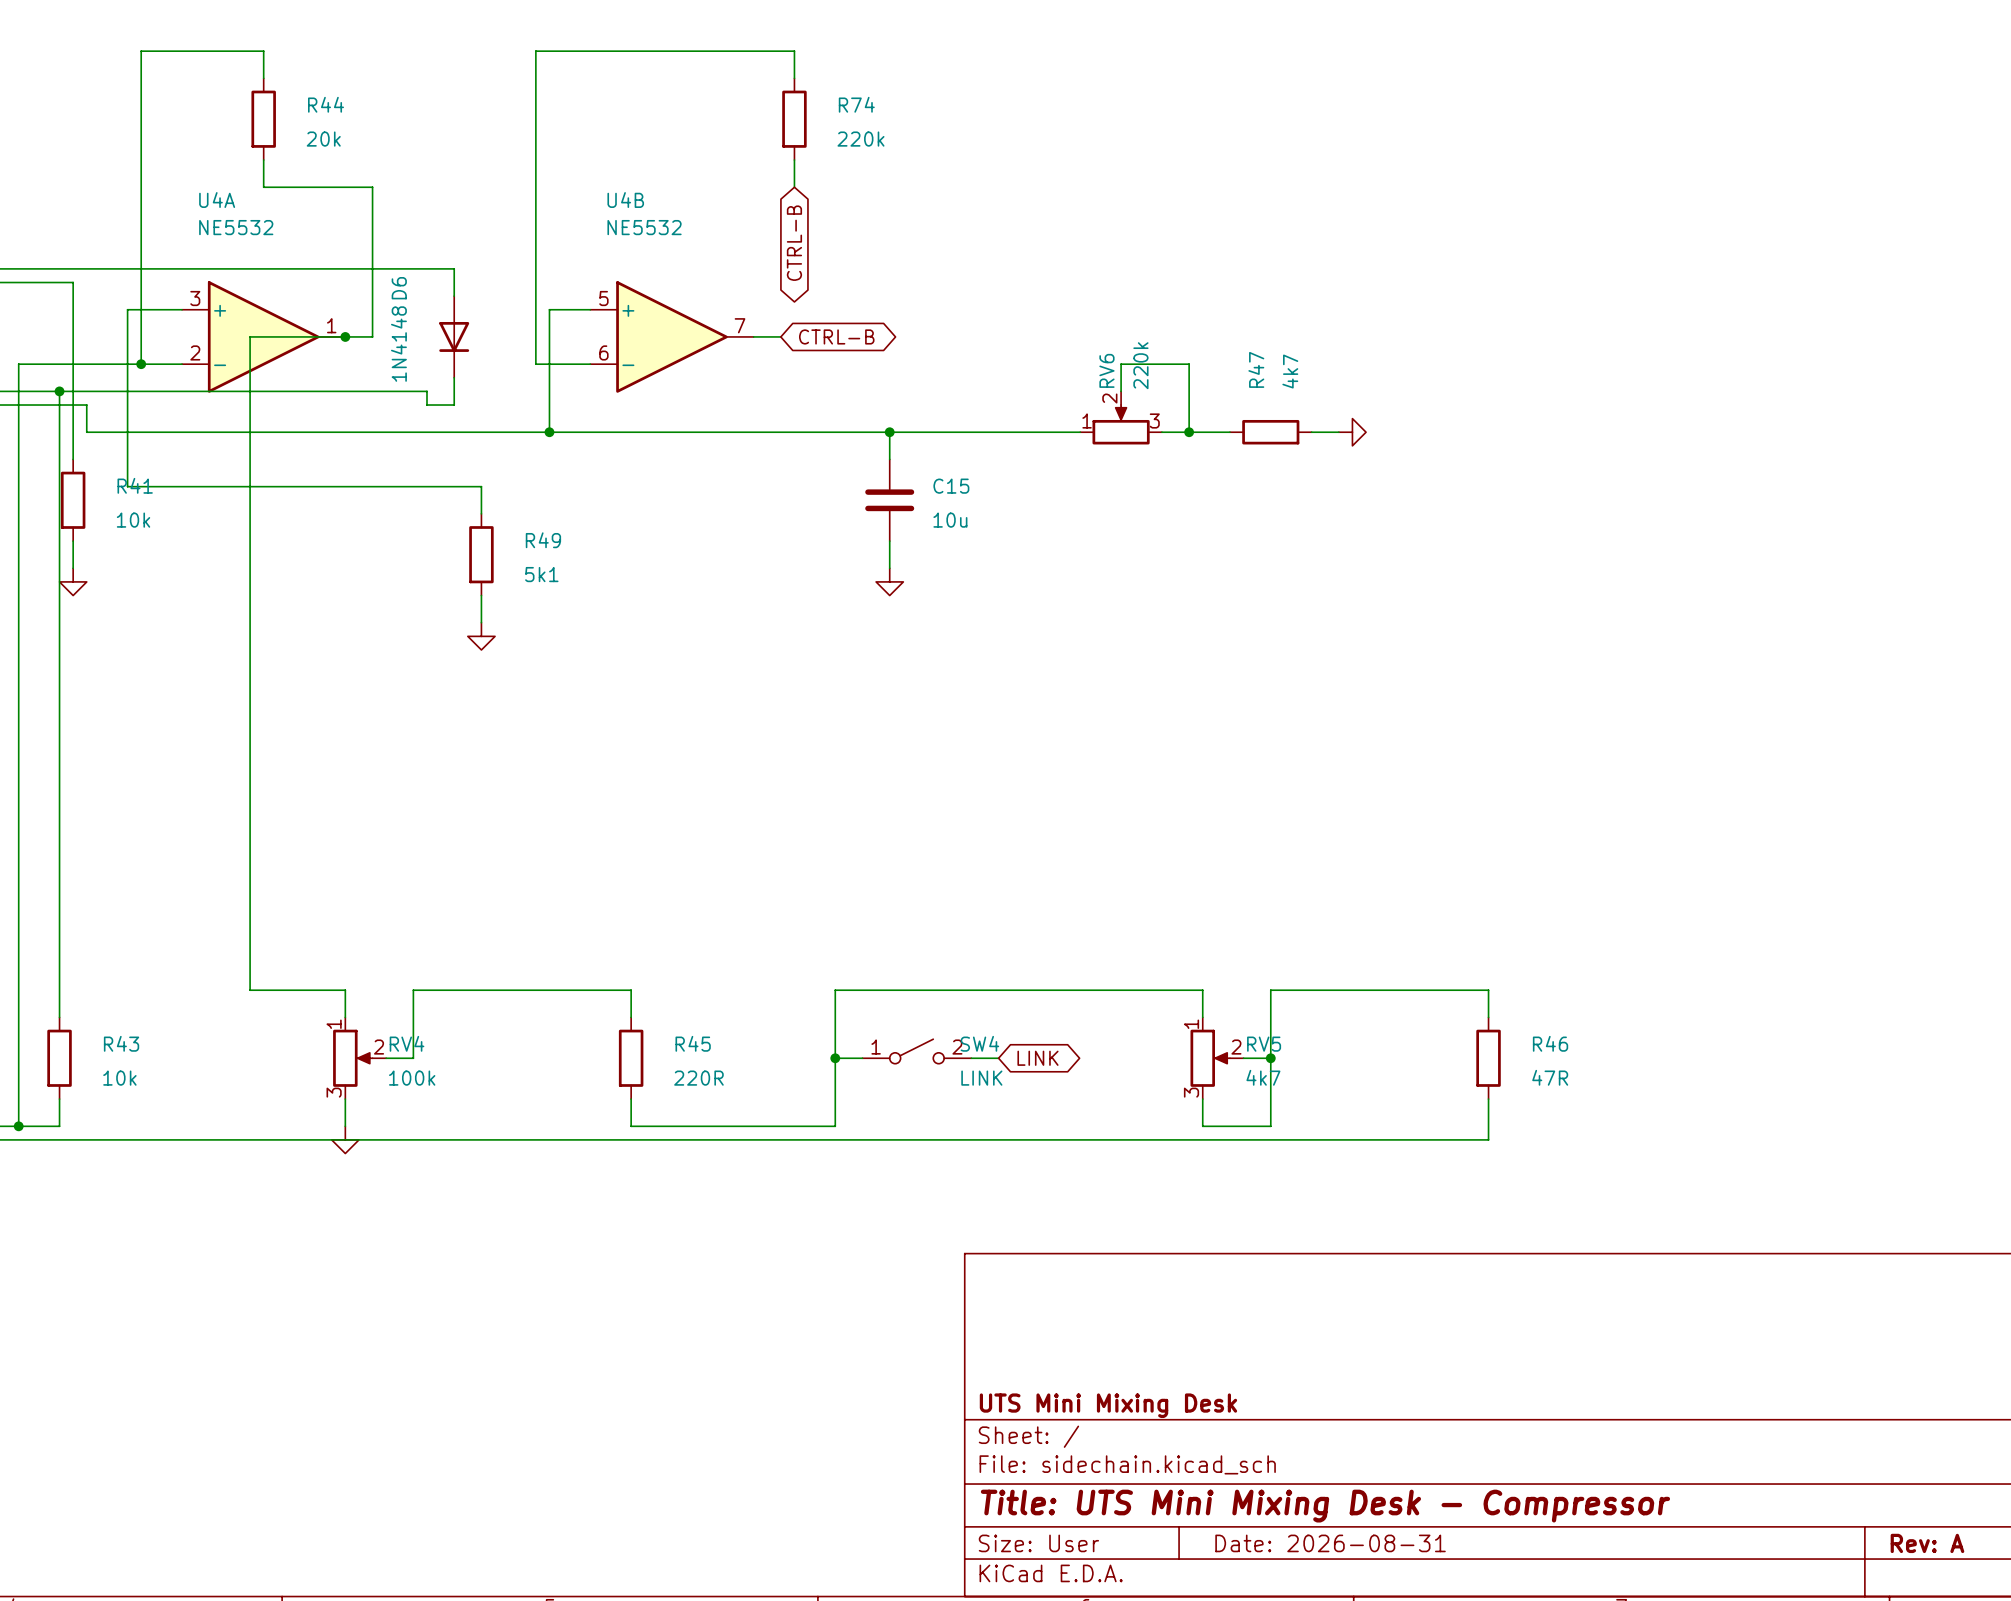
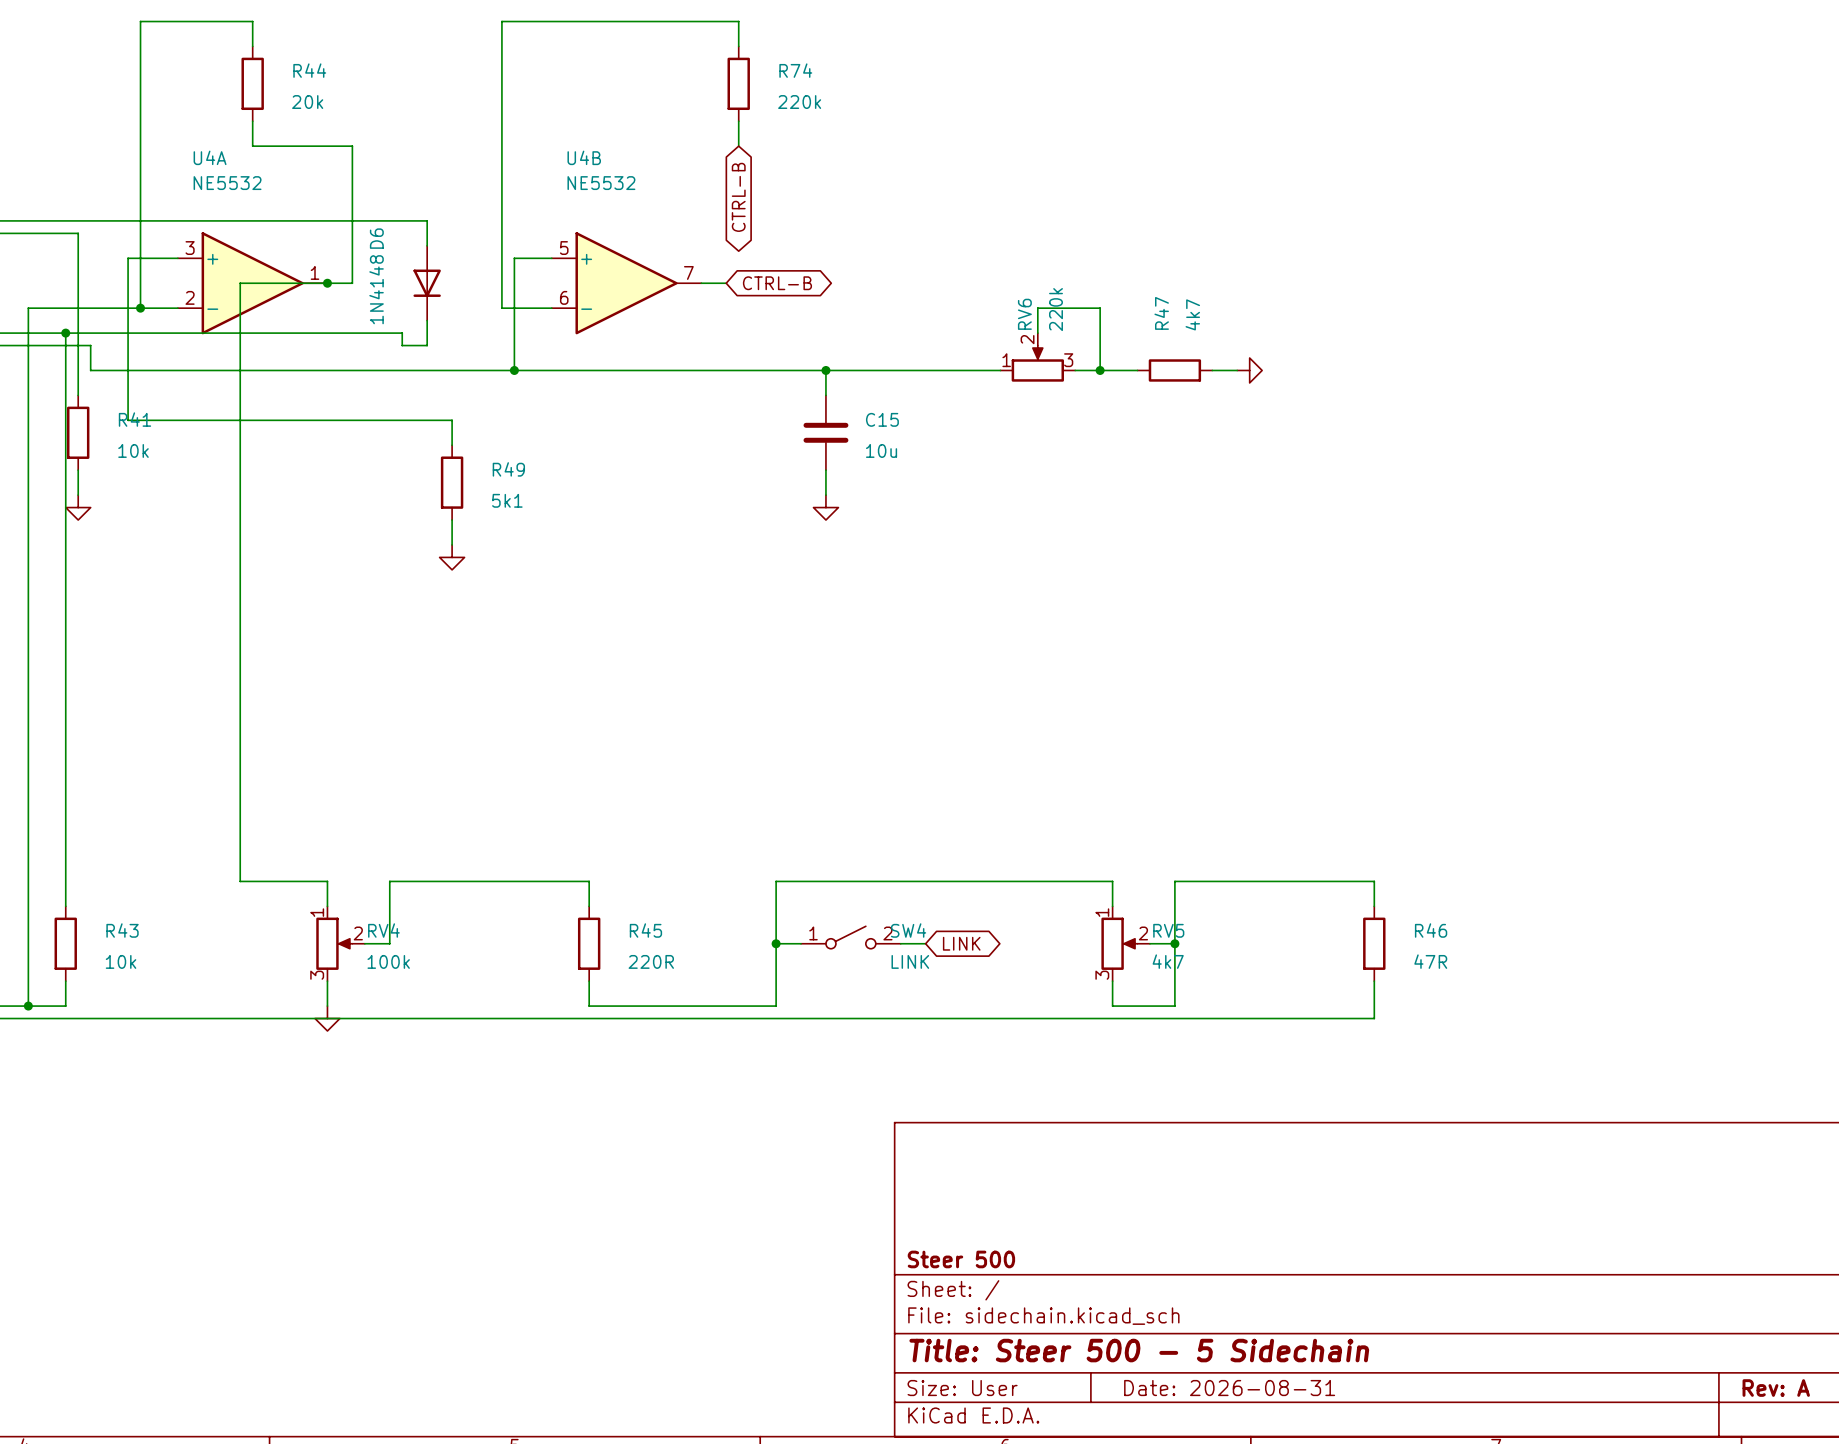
title block: UTS Mini Mixing Desk (1108, 1405) -> Steer 500 (961, 1259)
title block: Title: UTS Mini Mixing Desk - Compressor (1325, 1506) -> Title: Steer 500 - 5 Sidechain (1139, 1350)

